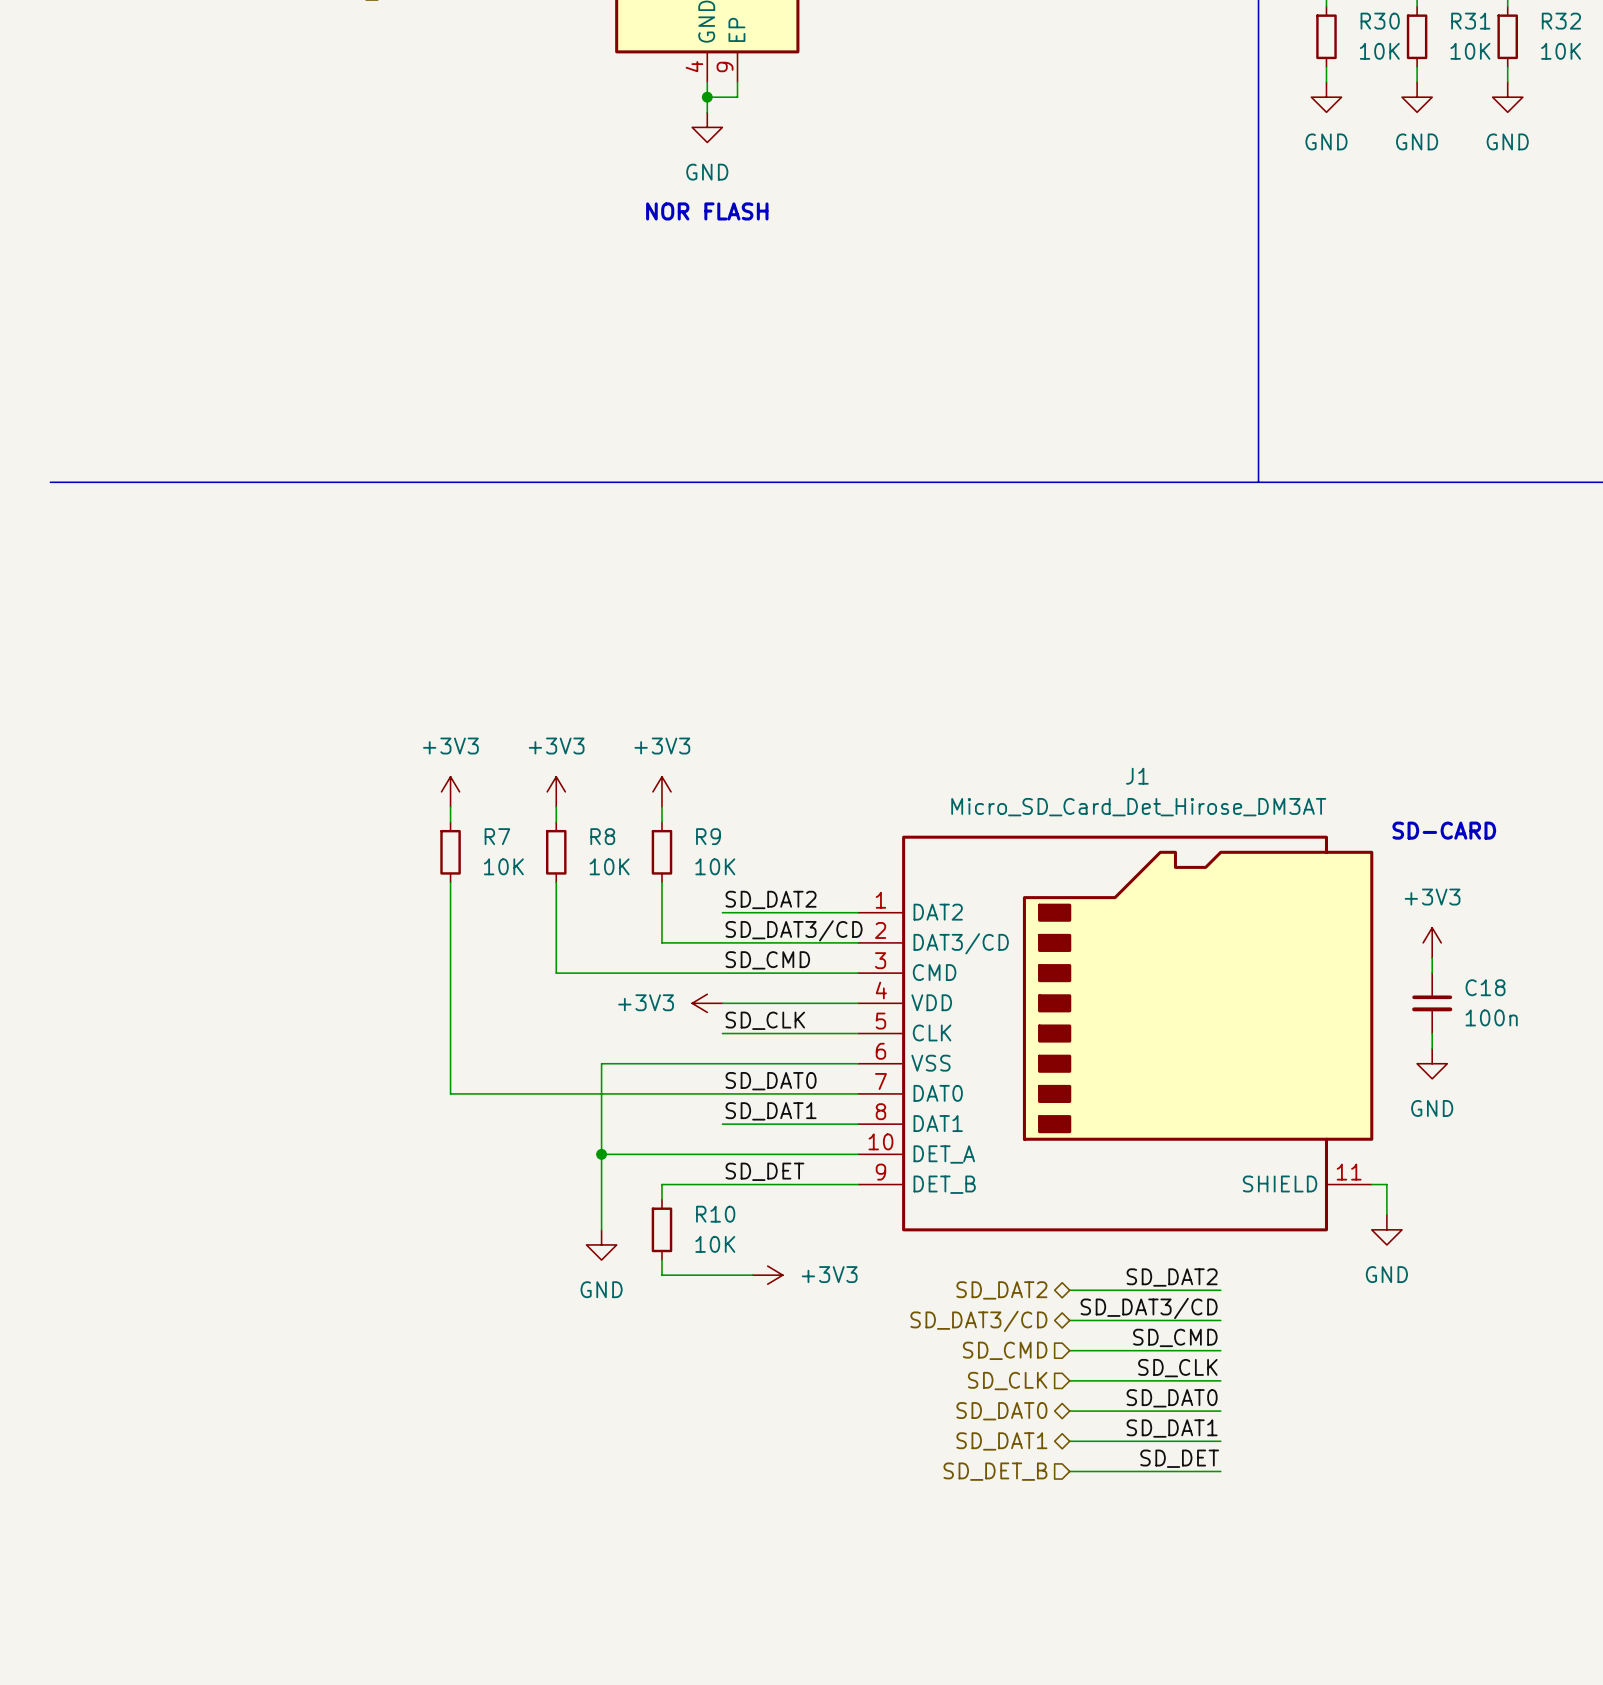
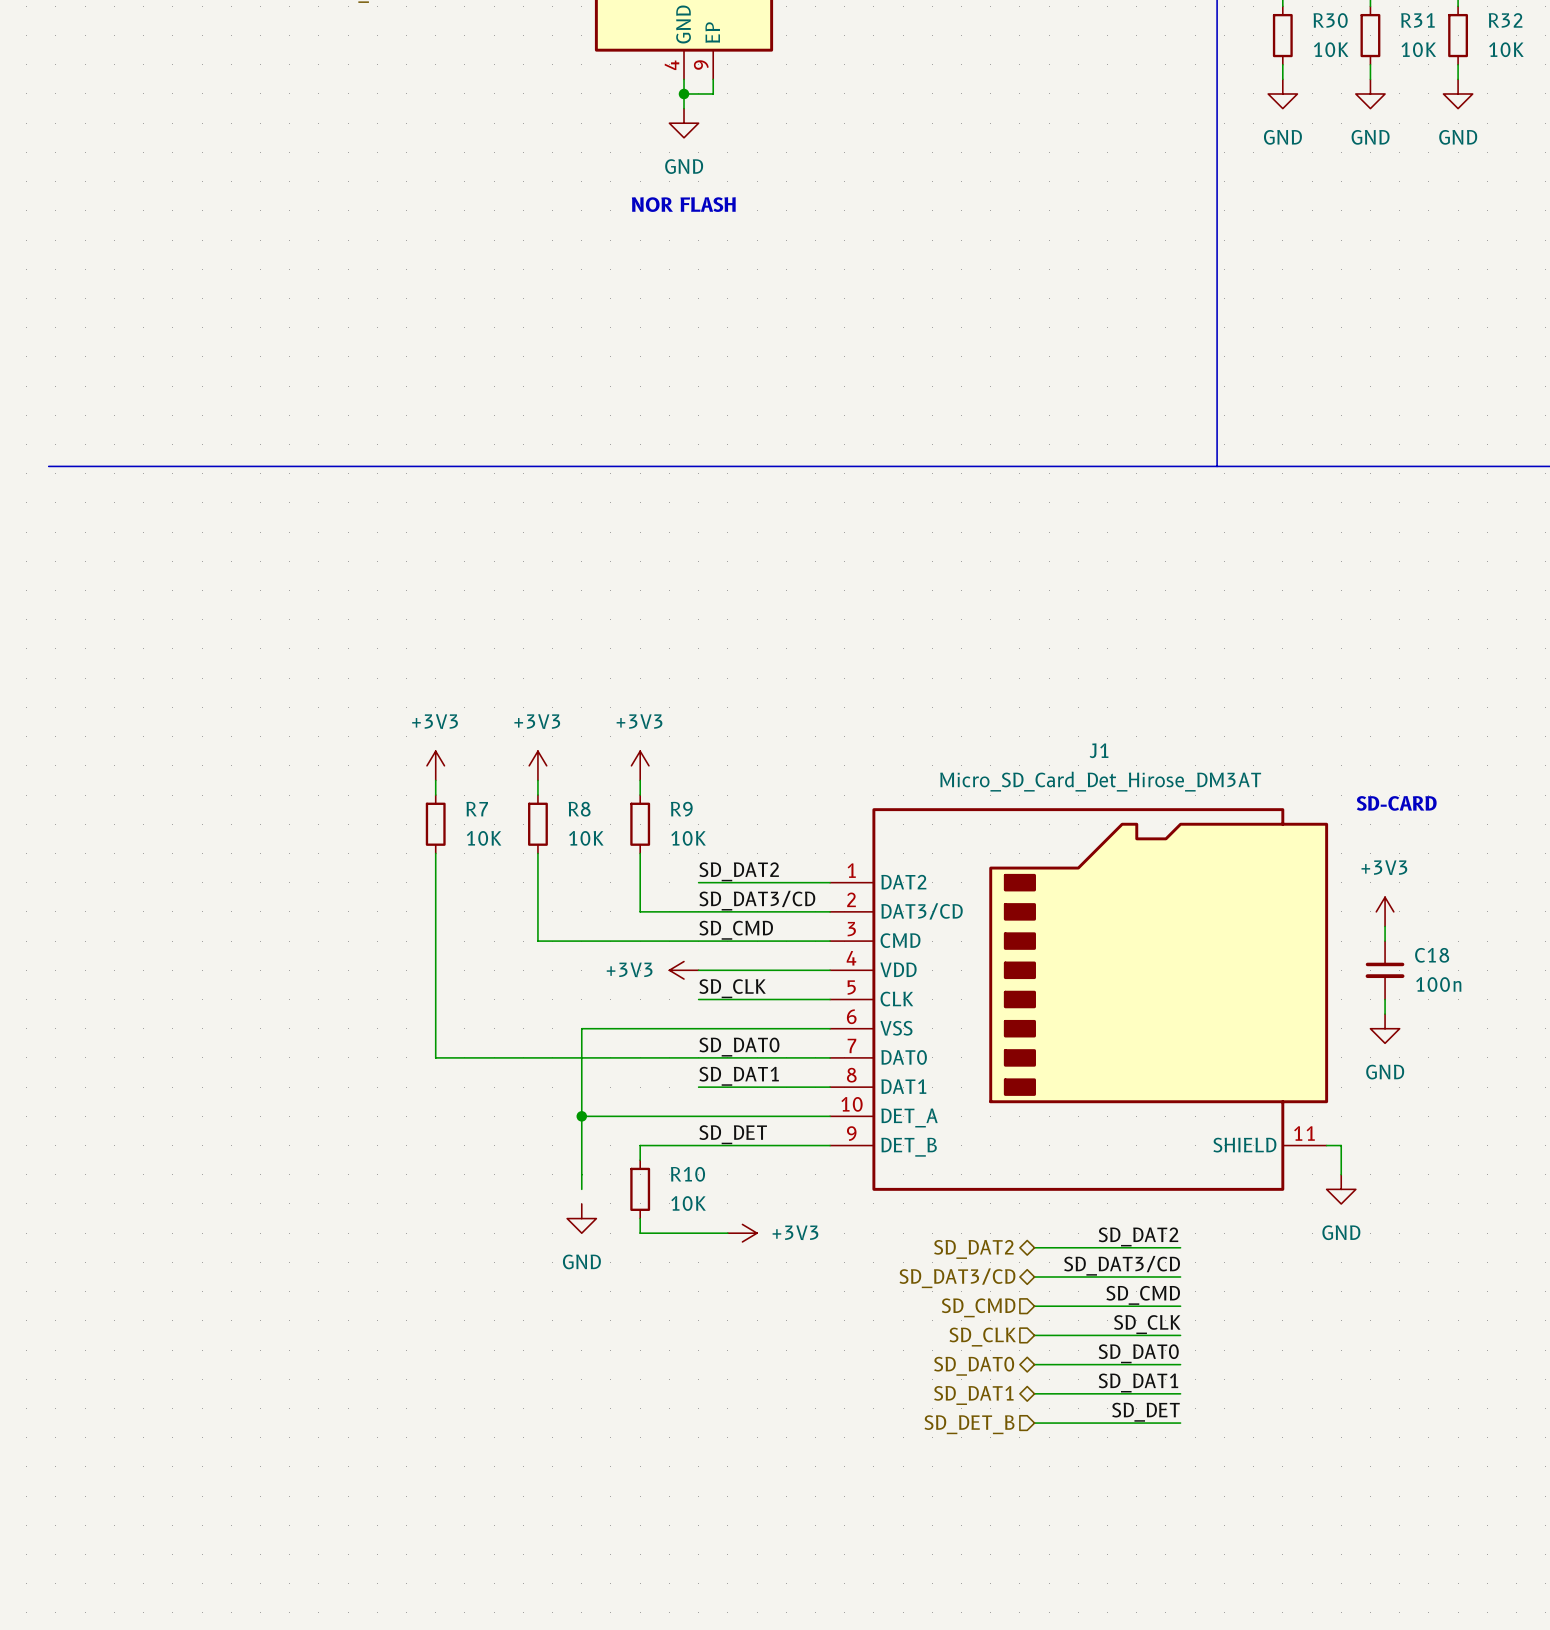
power symbol position: GND (601, 1244) -> GND (581, 1218)

